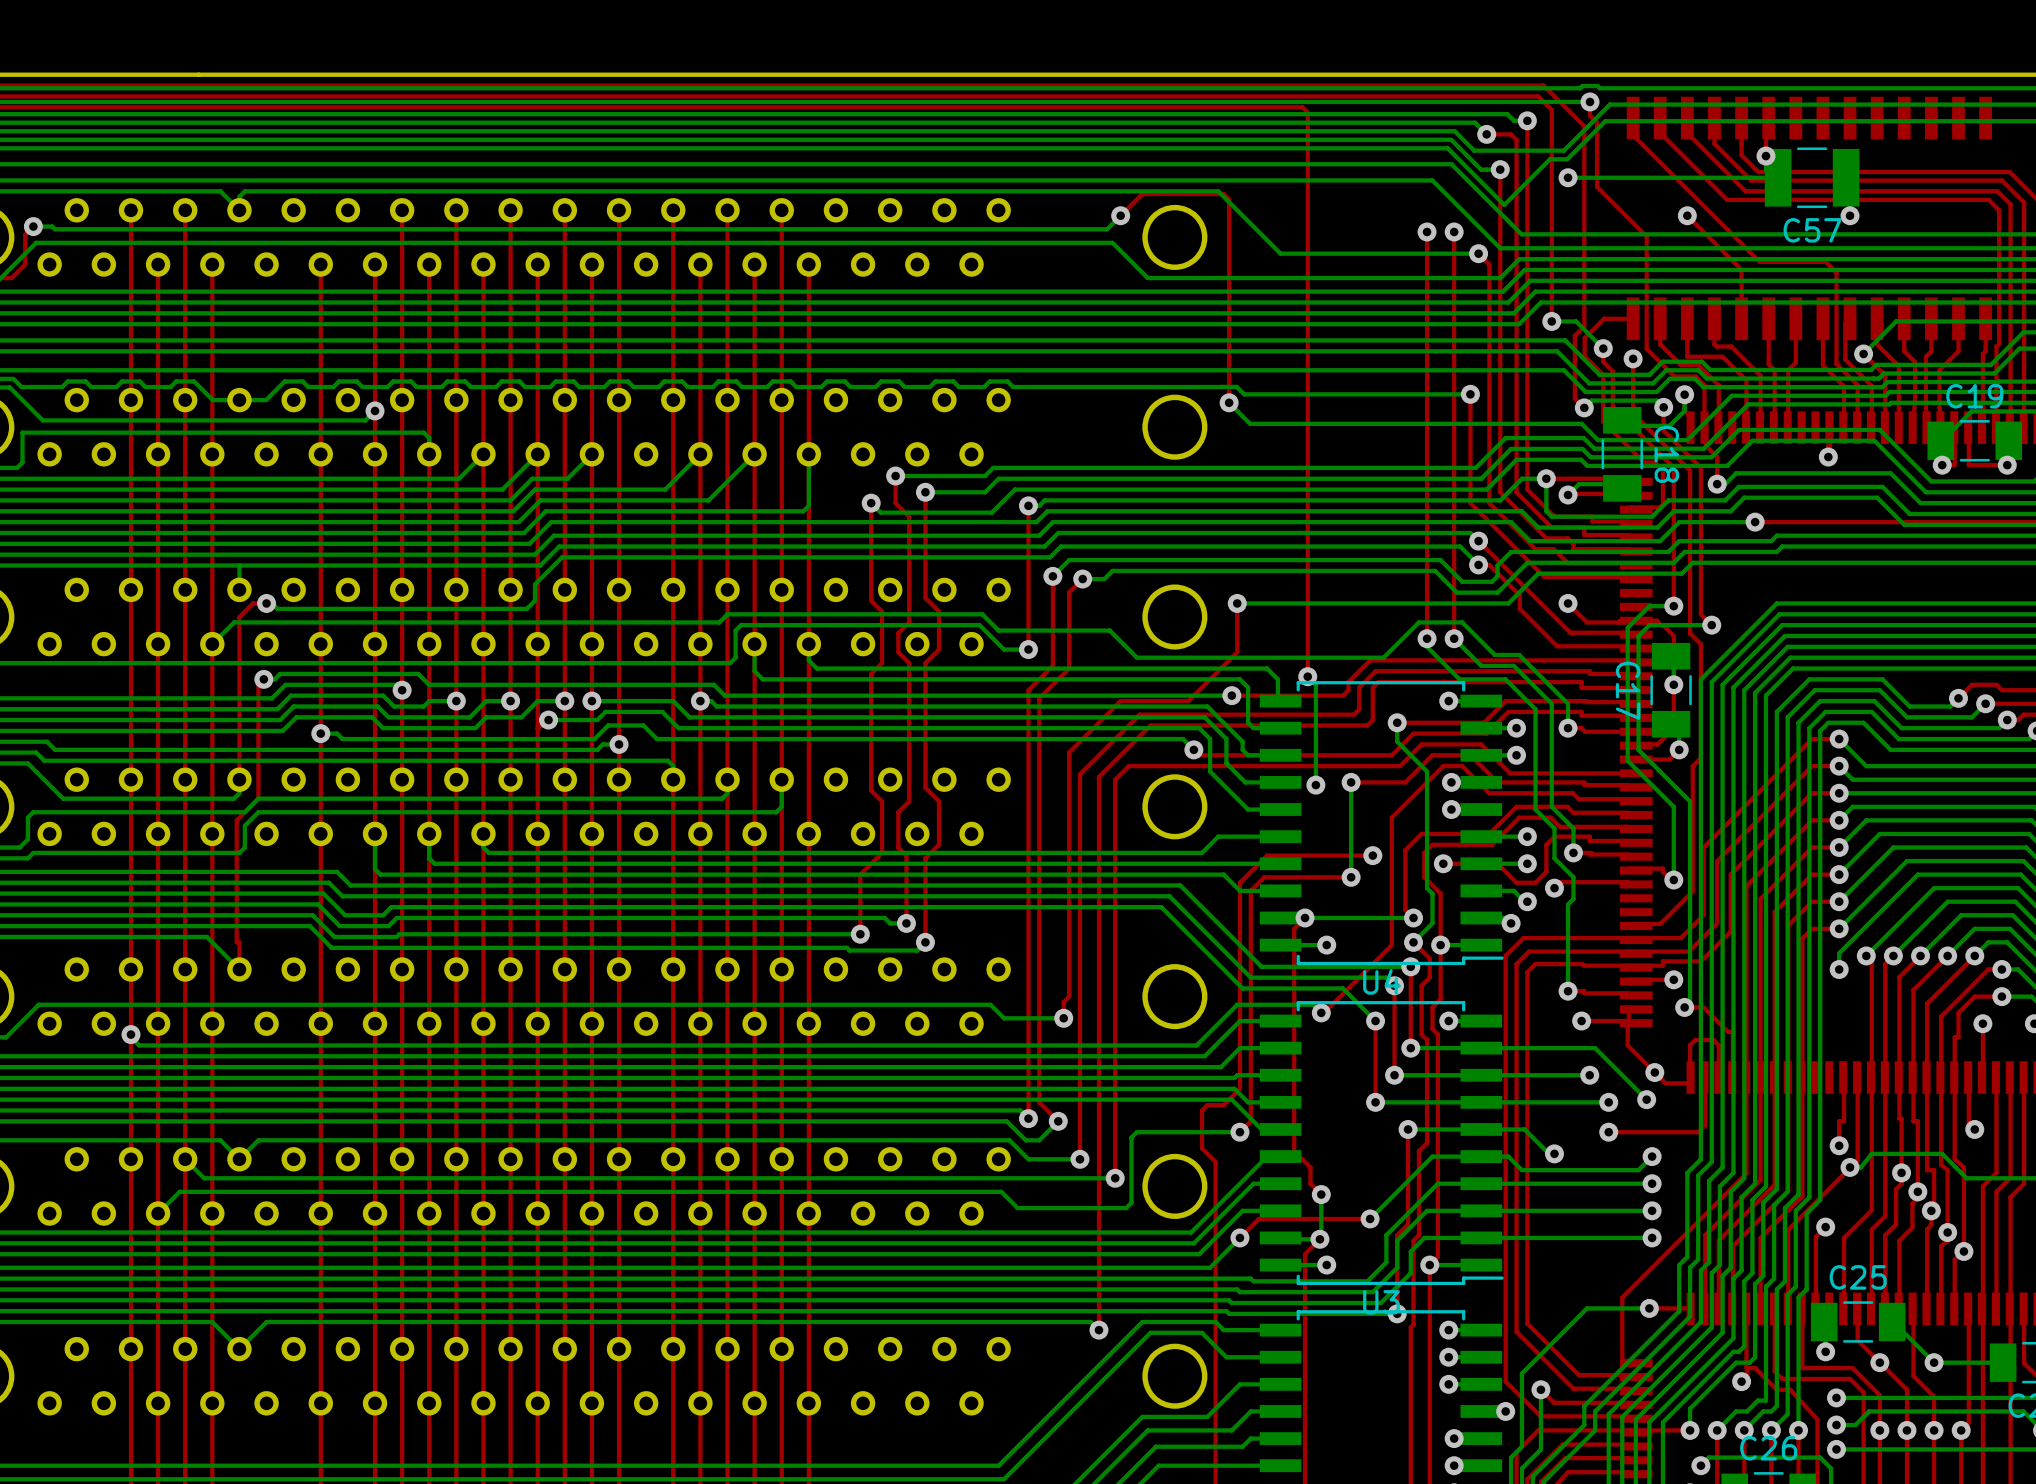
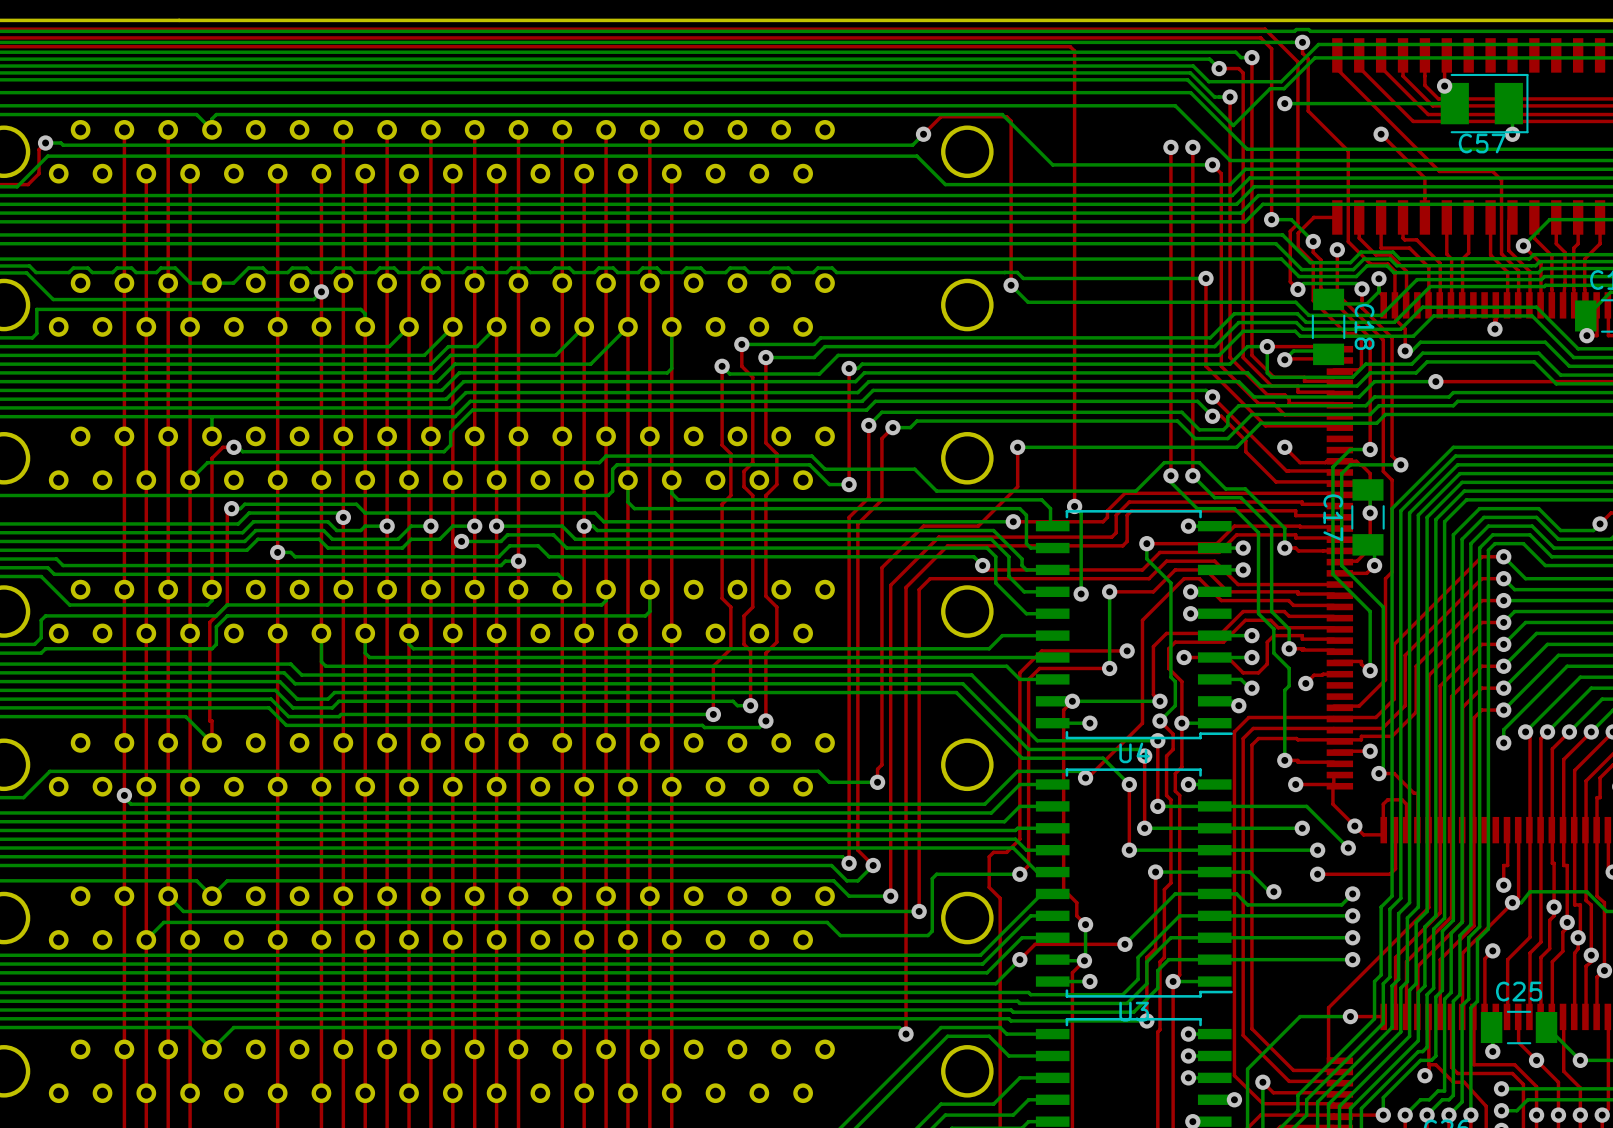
C57 footprint: [1764, 147, 1860, 209] -> [1440, 73, 1529, 134]
top track: (1628, 882) (1554, 882) (1554, 888) -> none
top track: none -> (1339, 674) (1314, 675) (1305, 683)
via position: (1554, 888) -> (1305, 683)

